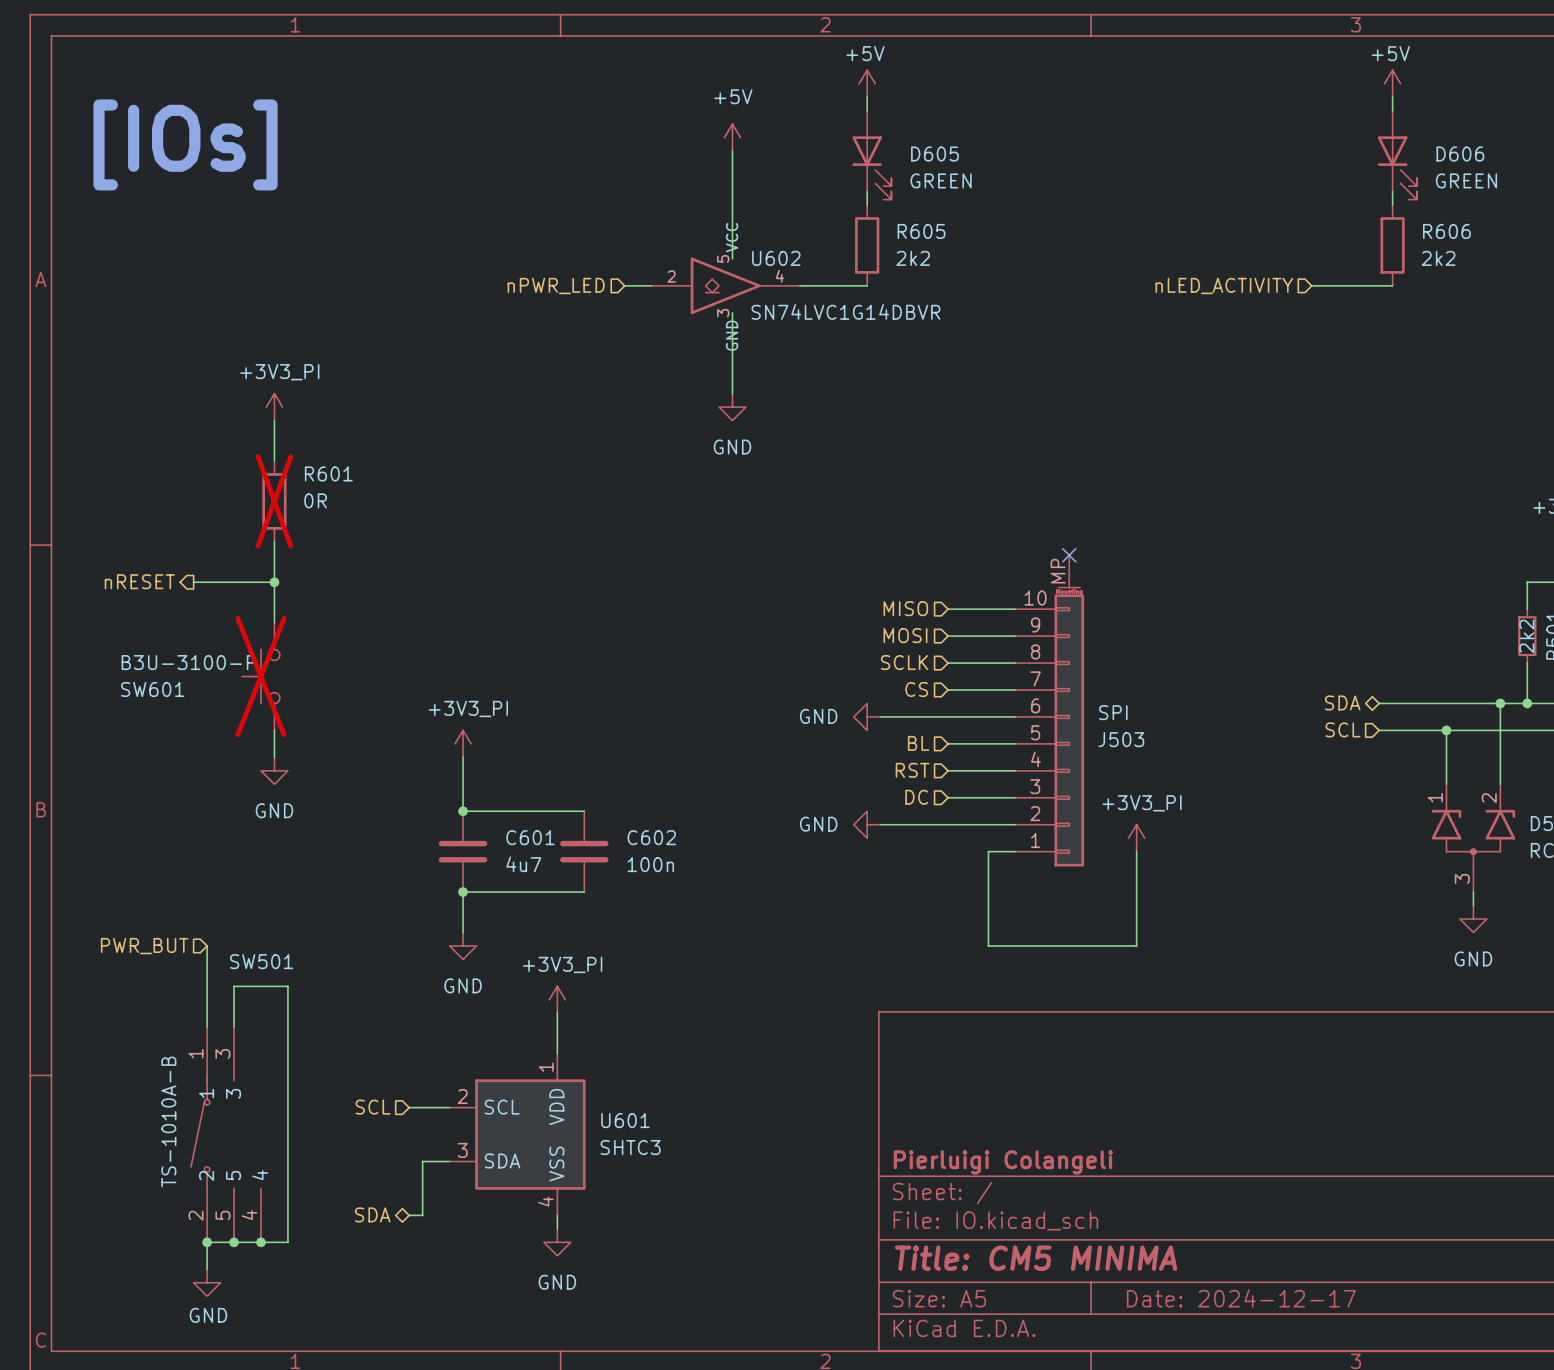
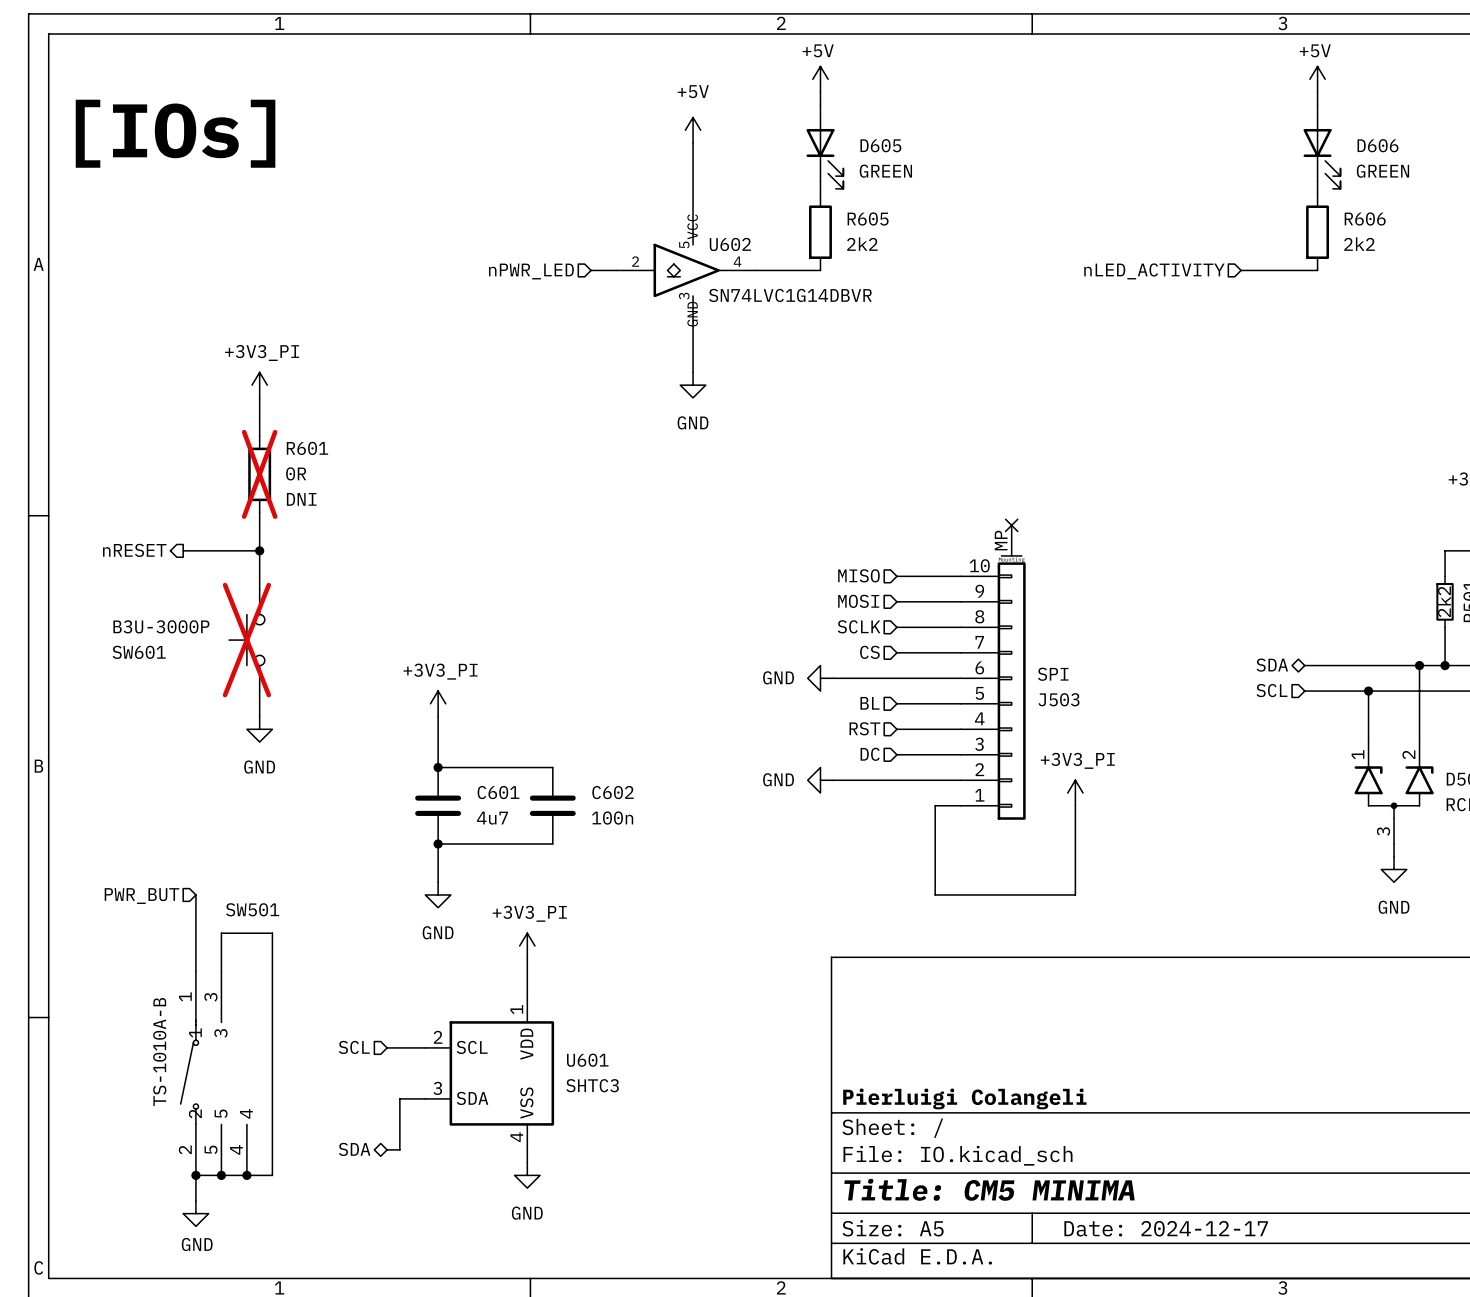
R601 text: none -> DNI (301, 499)
SW601 value: B3U-3100-P (188, 662) -> B3U-3000P (161, 626)

